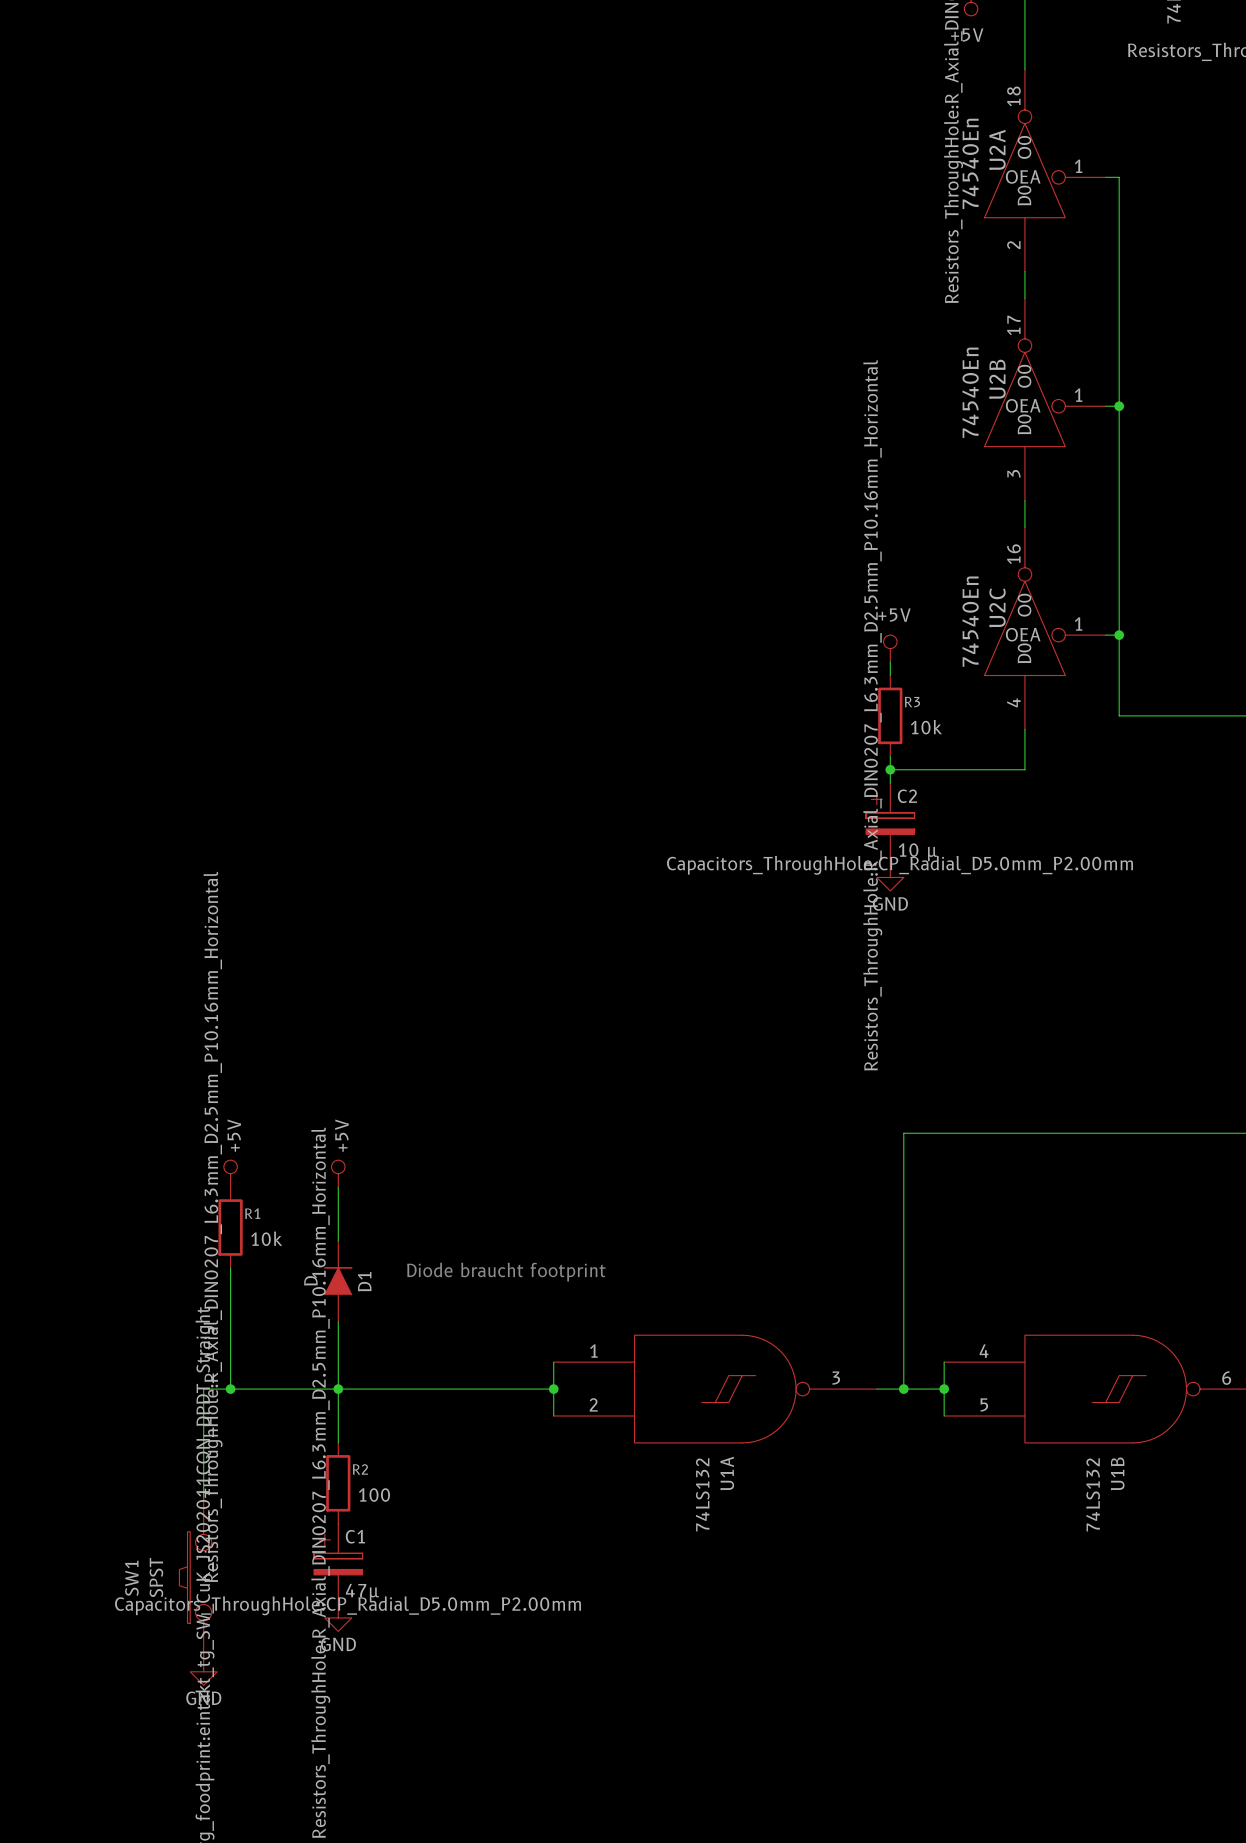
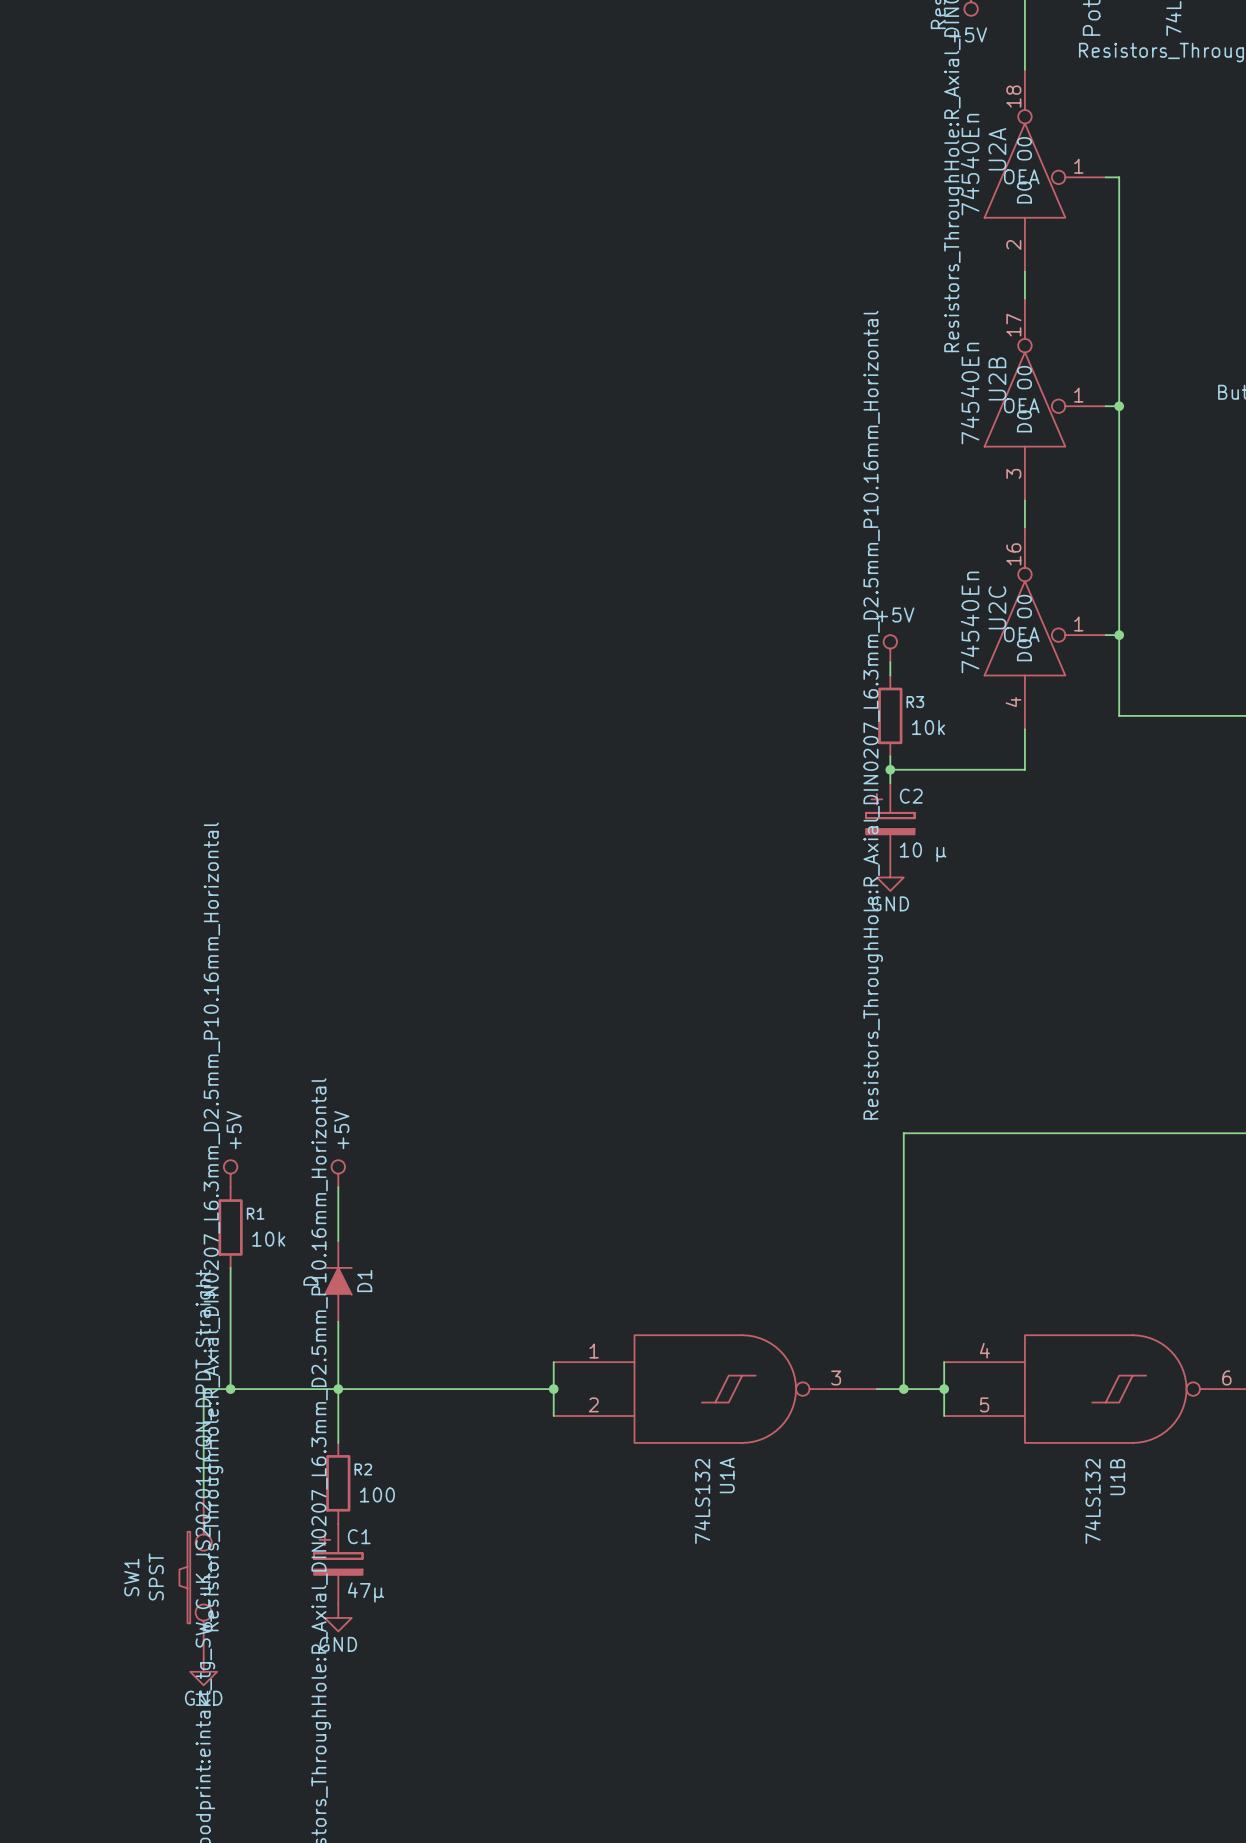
C2 text: Capacitors_ThroughHole:CP_Radial_D5.0mm_P2.00mm (900, 865) -> none
text: Diode braucht footprint (506, 1272) -> none
C1 text: Capacitors_ThroughHole:CP_Radial_D5.0mm_P2.00mm (348, 1605) -> none

